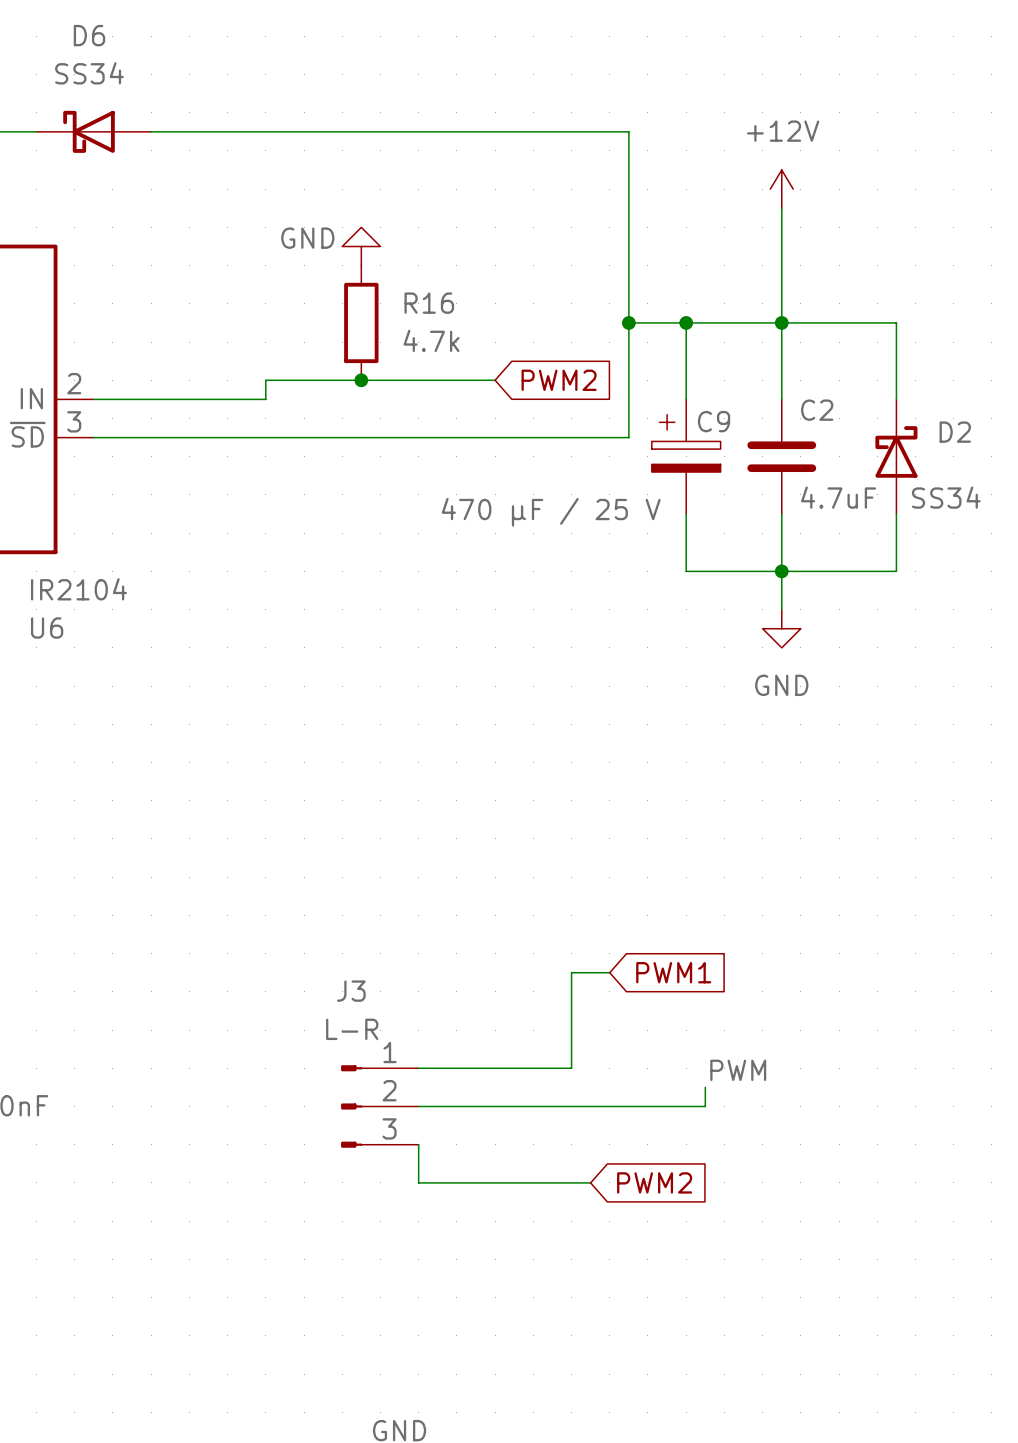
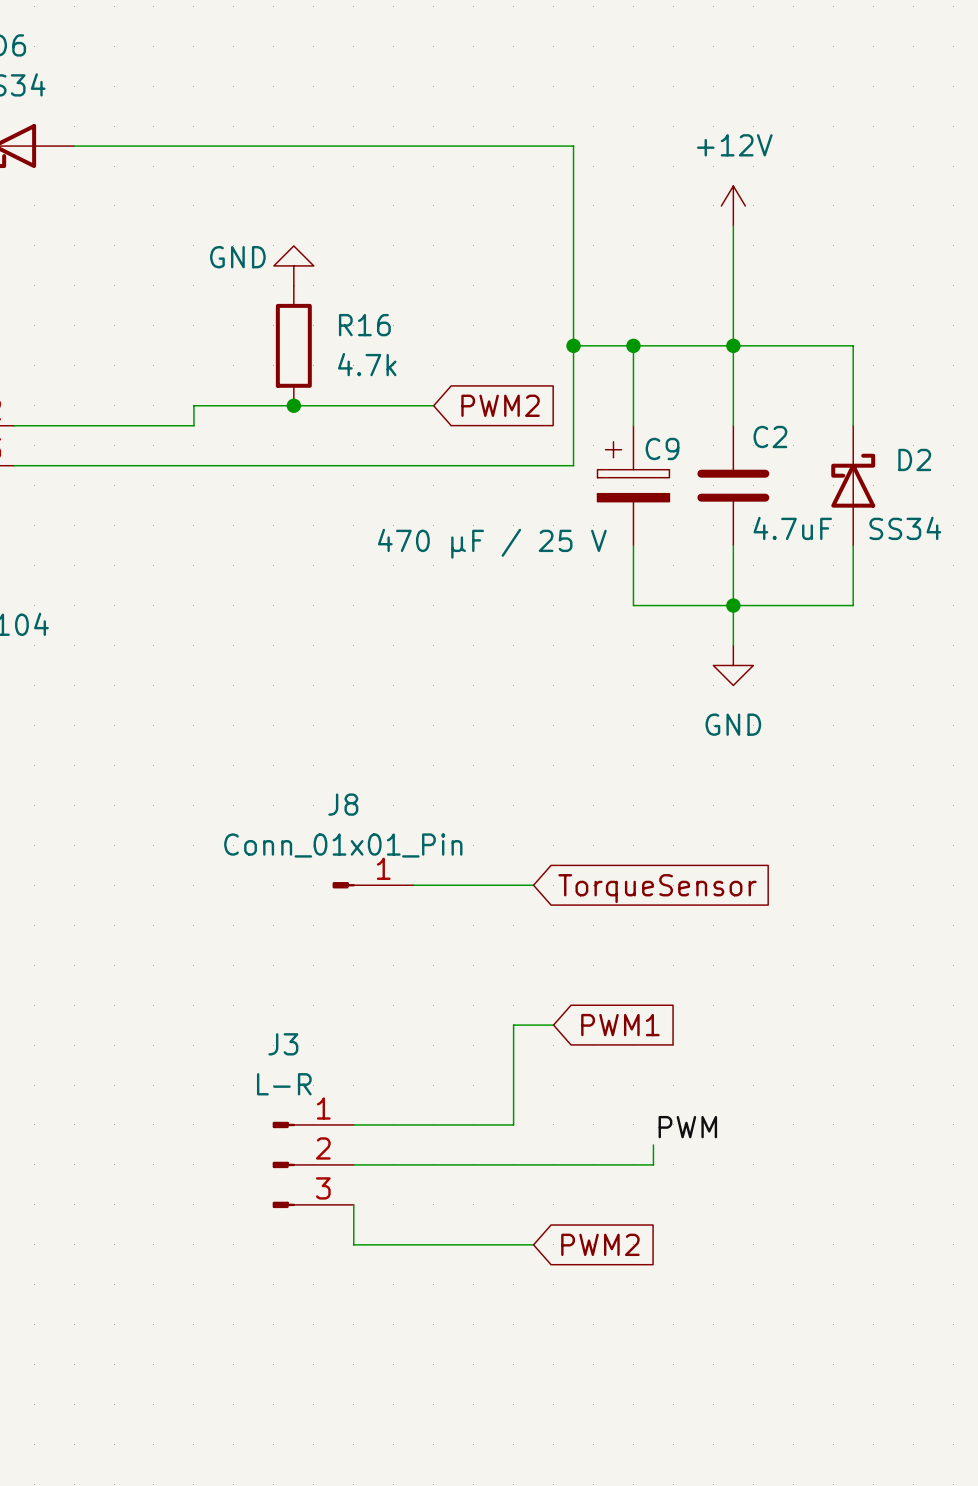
J8: none -> Conn_01x01_Pin (373, 885)
wire: none -> (413, 885) (533, 885)
global label: none -> TorqueSensor (657, 888)

